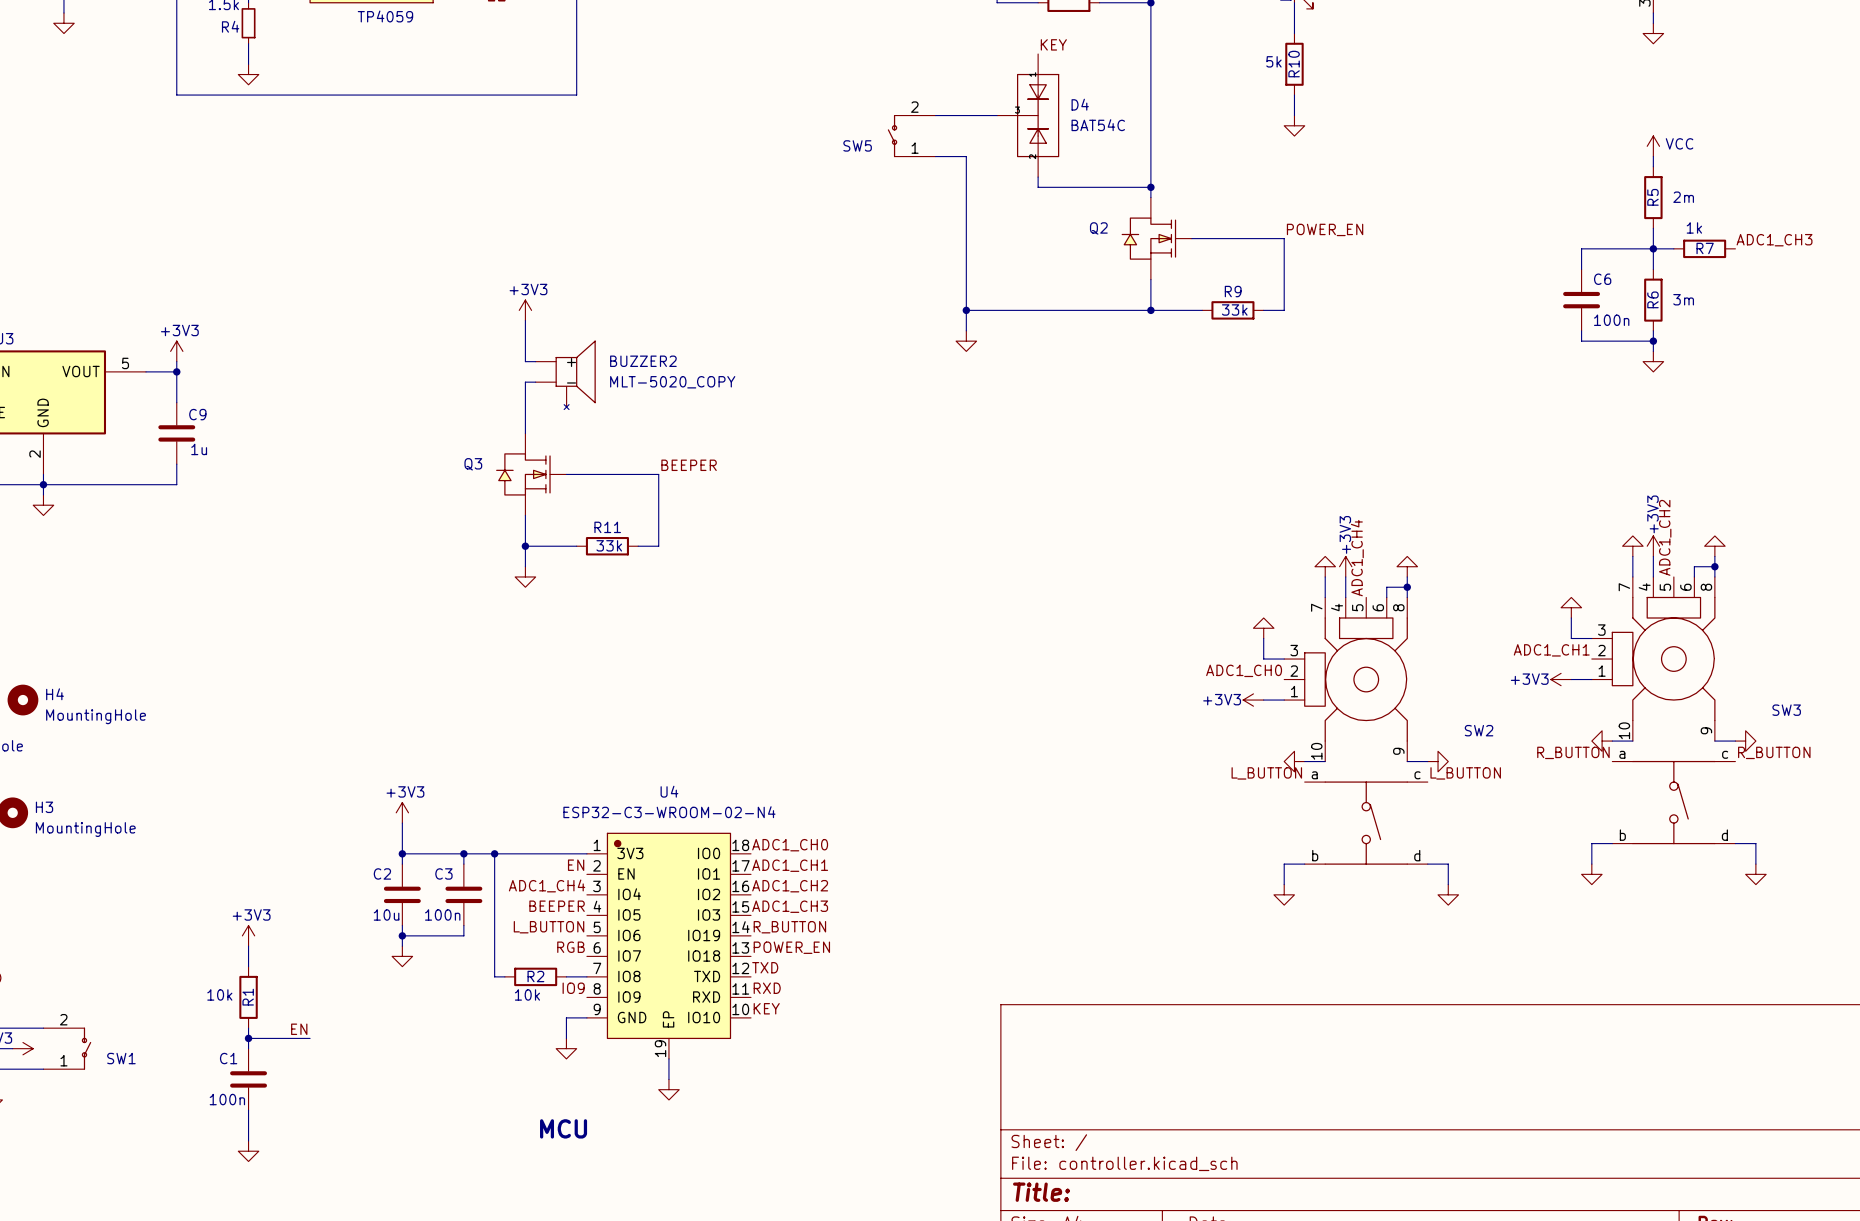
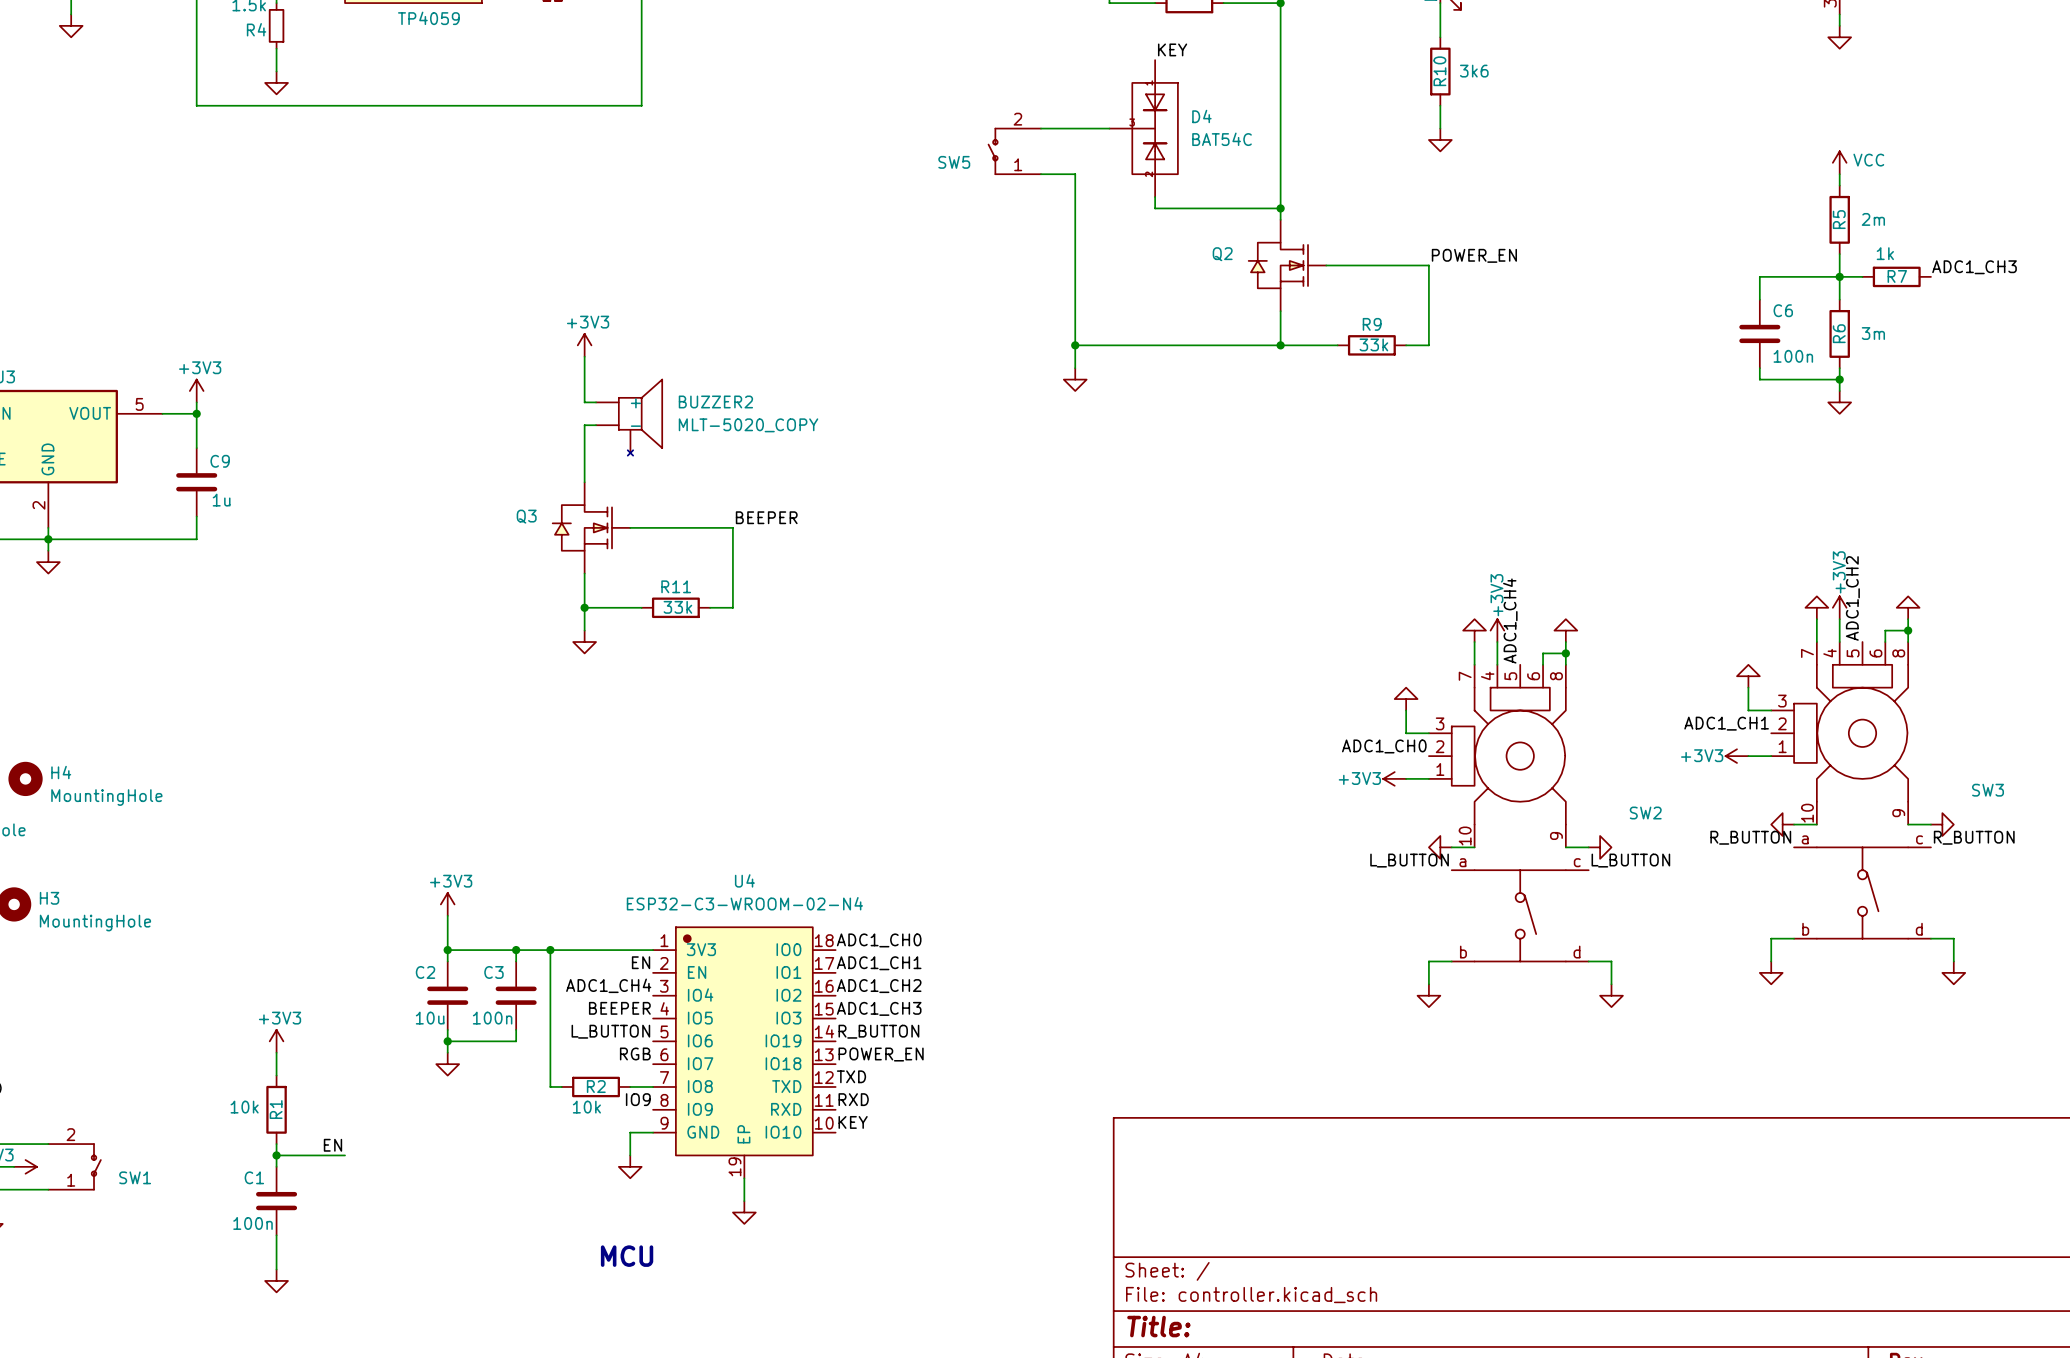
R10 value: 5k (1273, 61) -> 3k6 (1474, 71)

